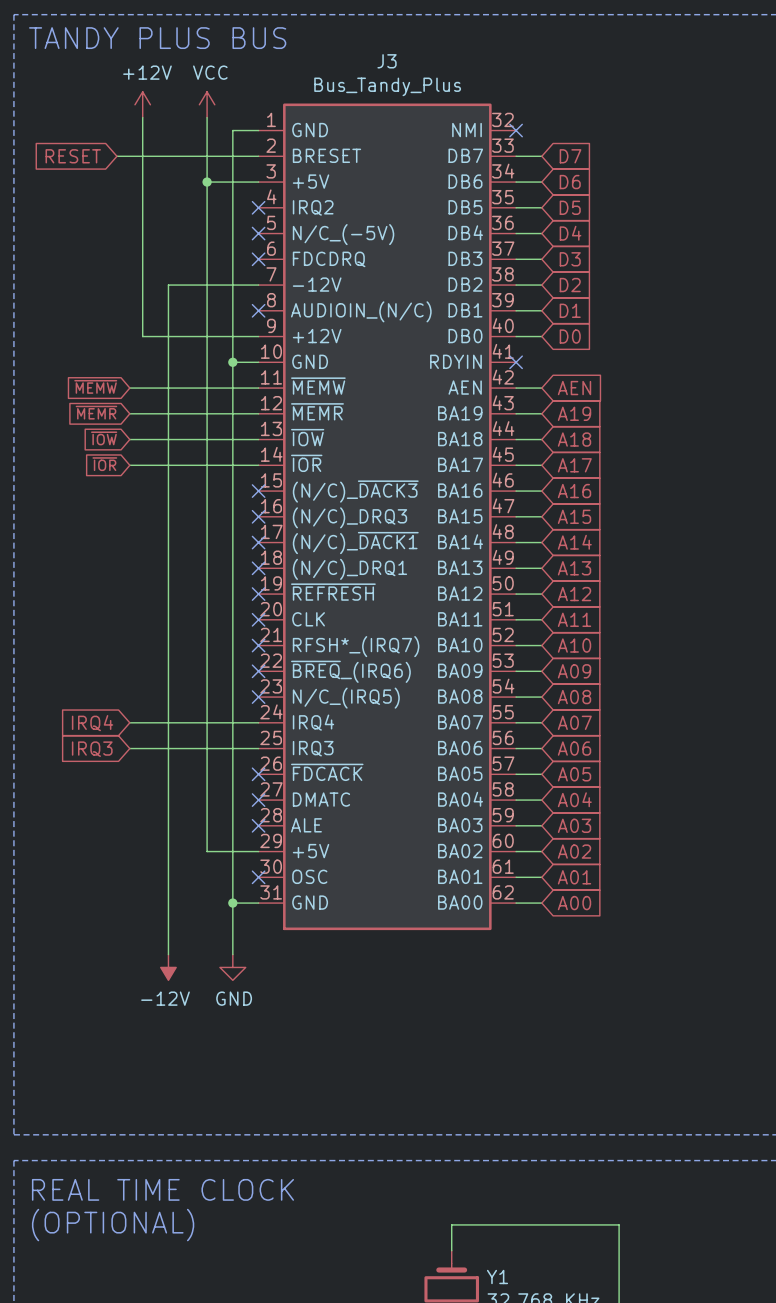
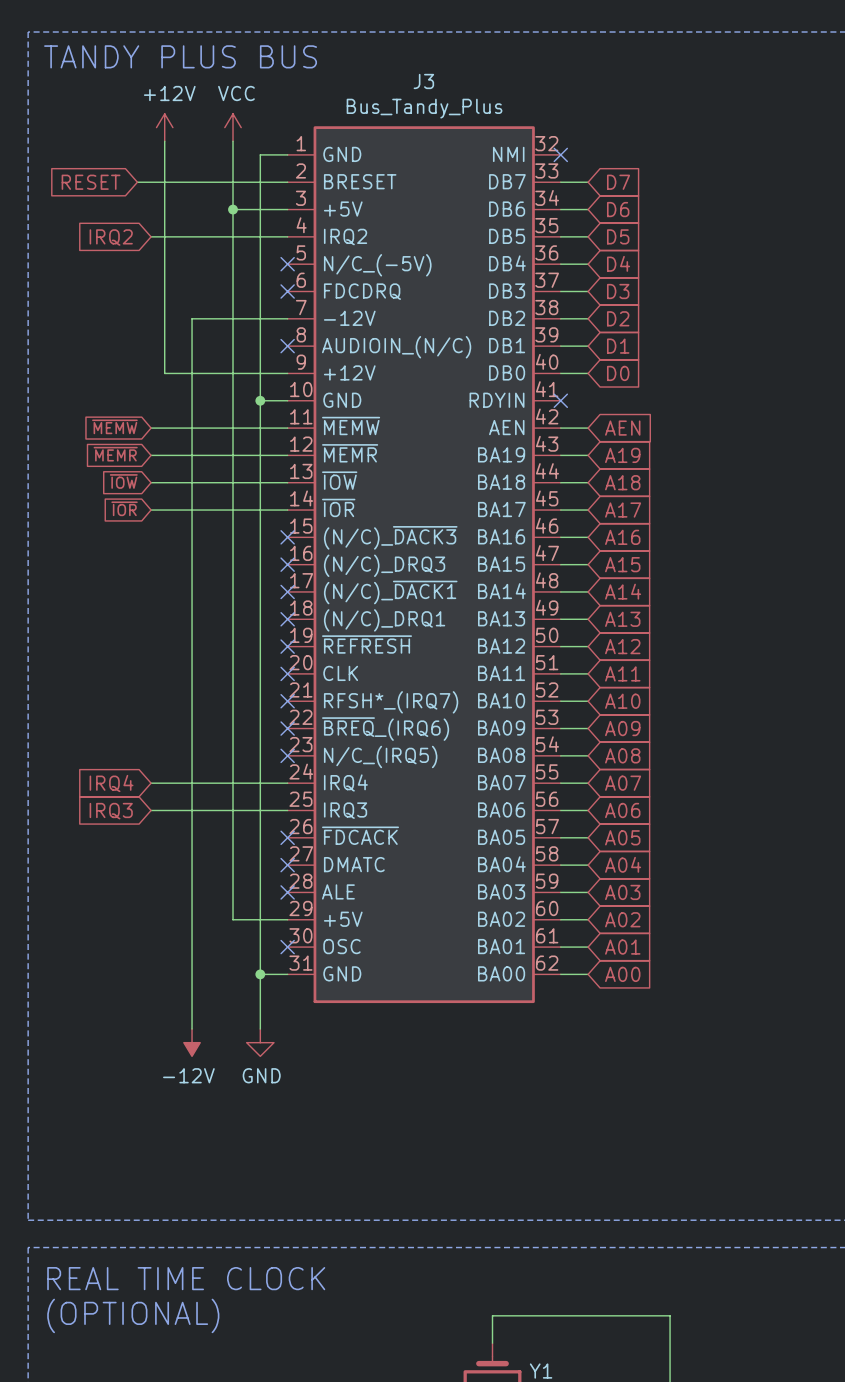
wire: none -> (151, 236) (287, 236)
no-connect mark: (258, 207) -> none
global label: none -> IRQ2 (111, 237)

